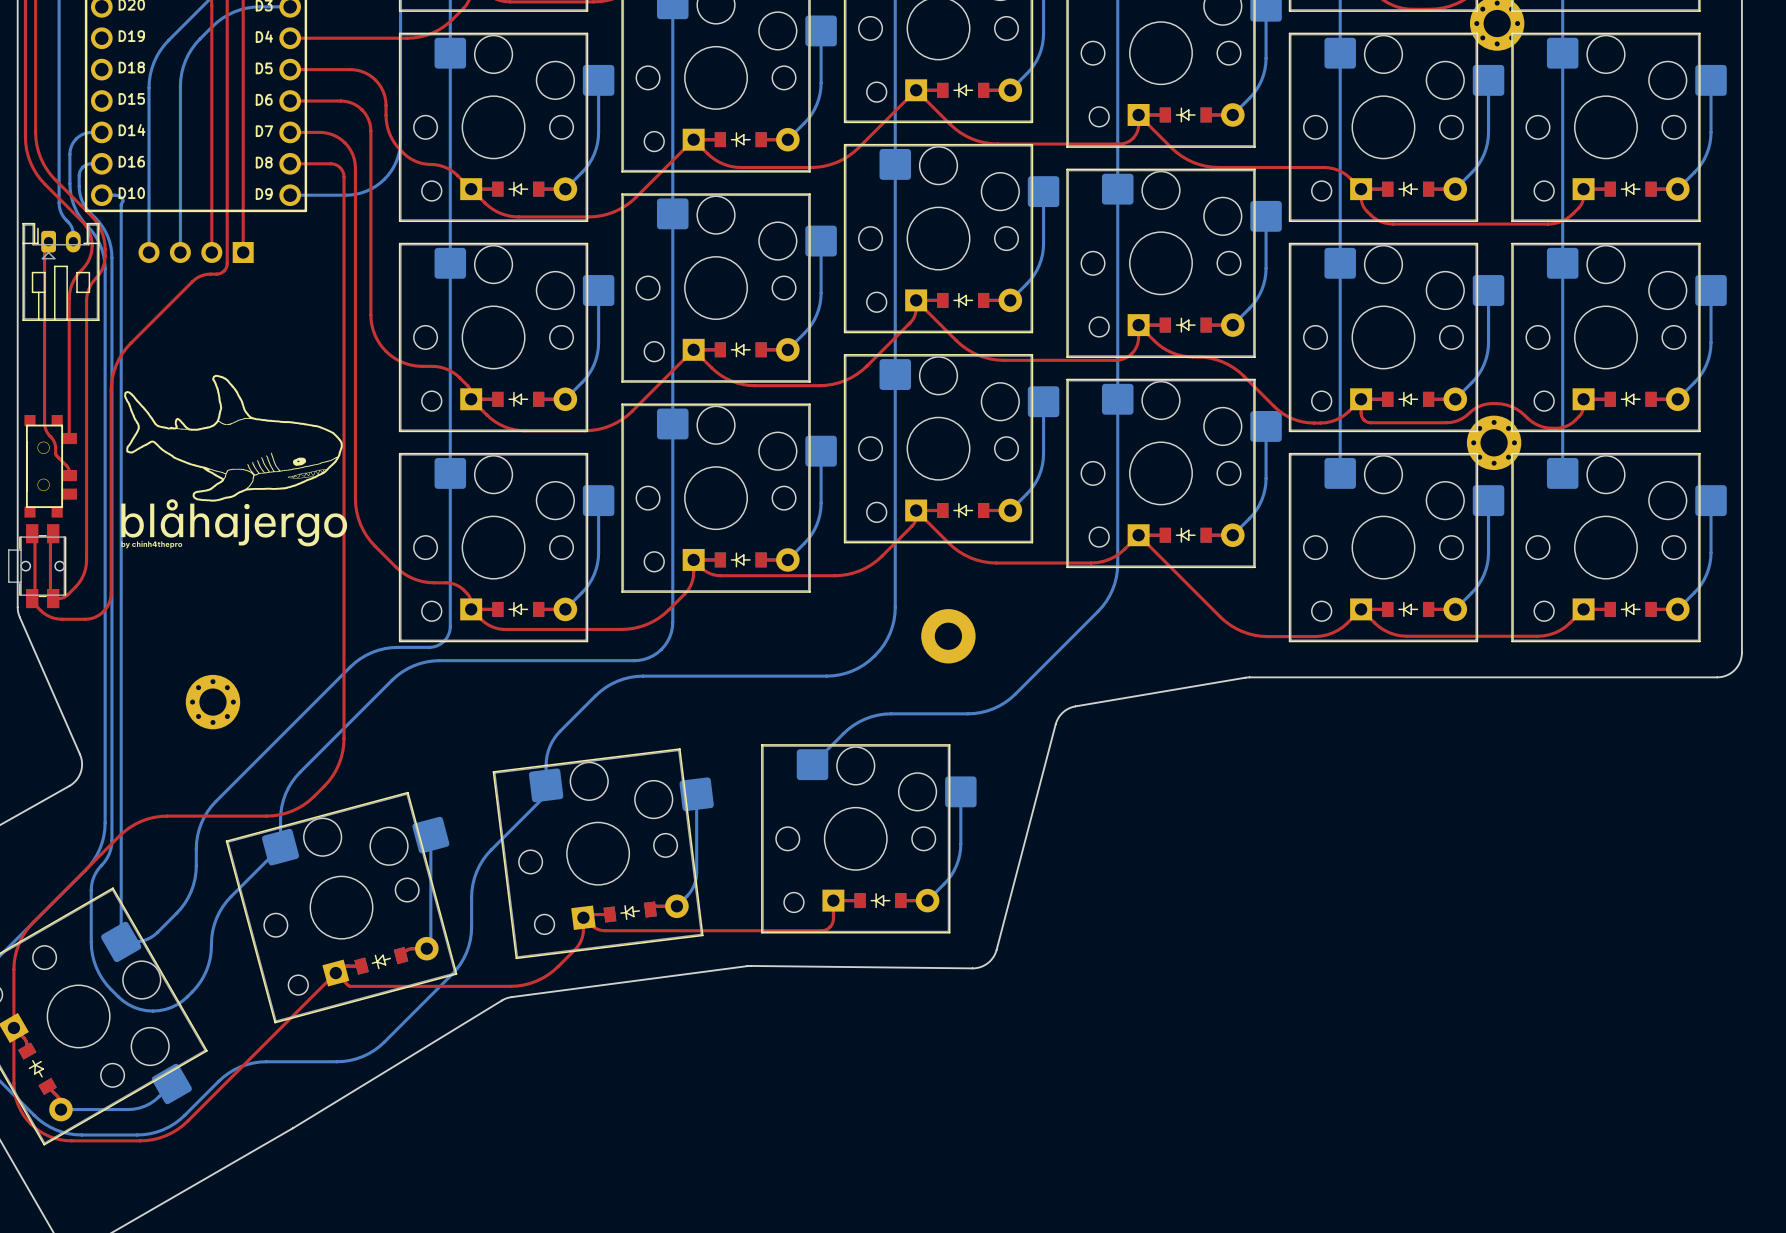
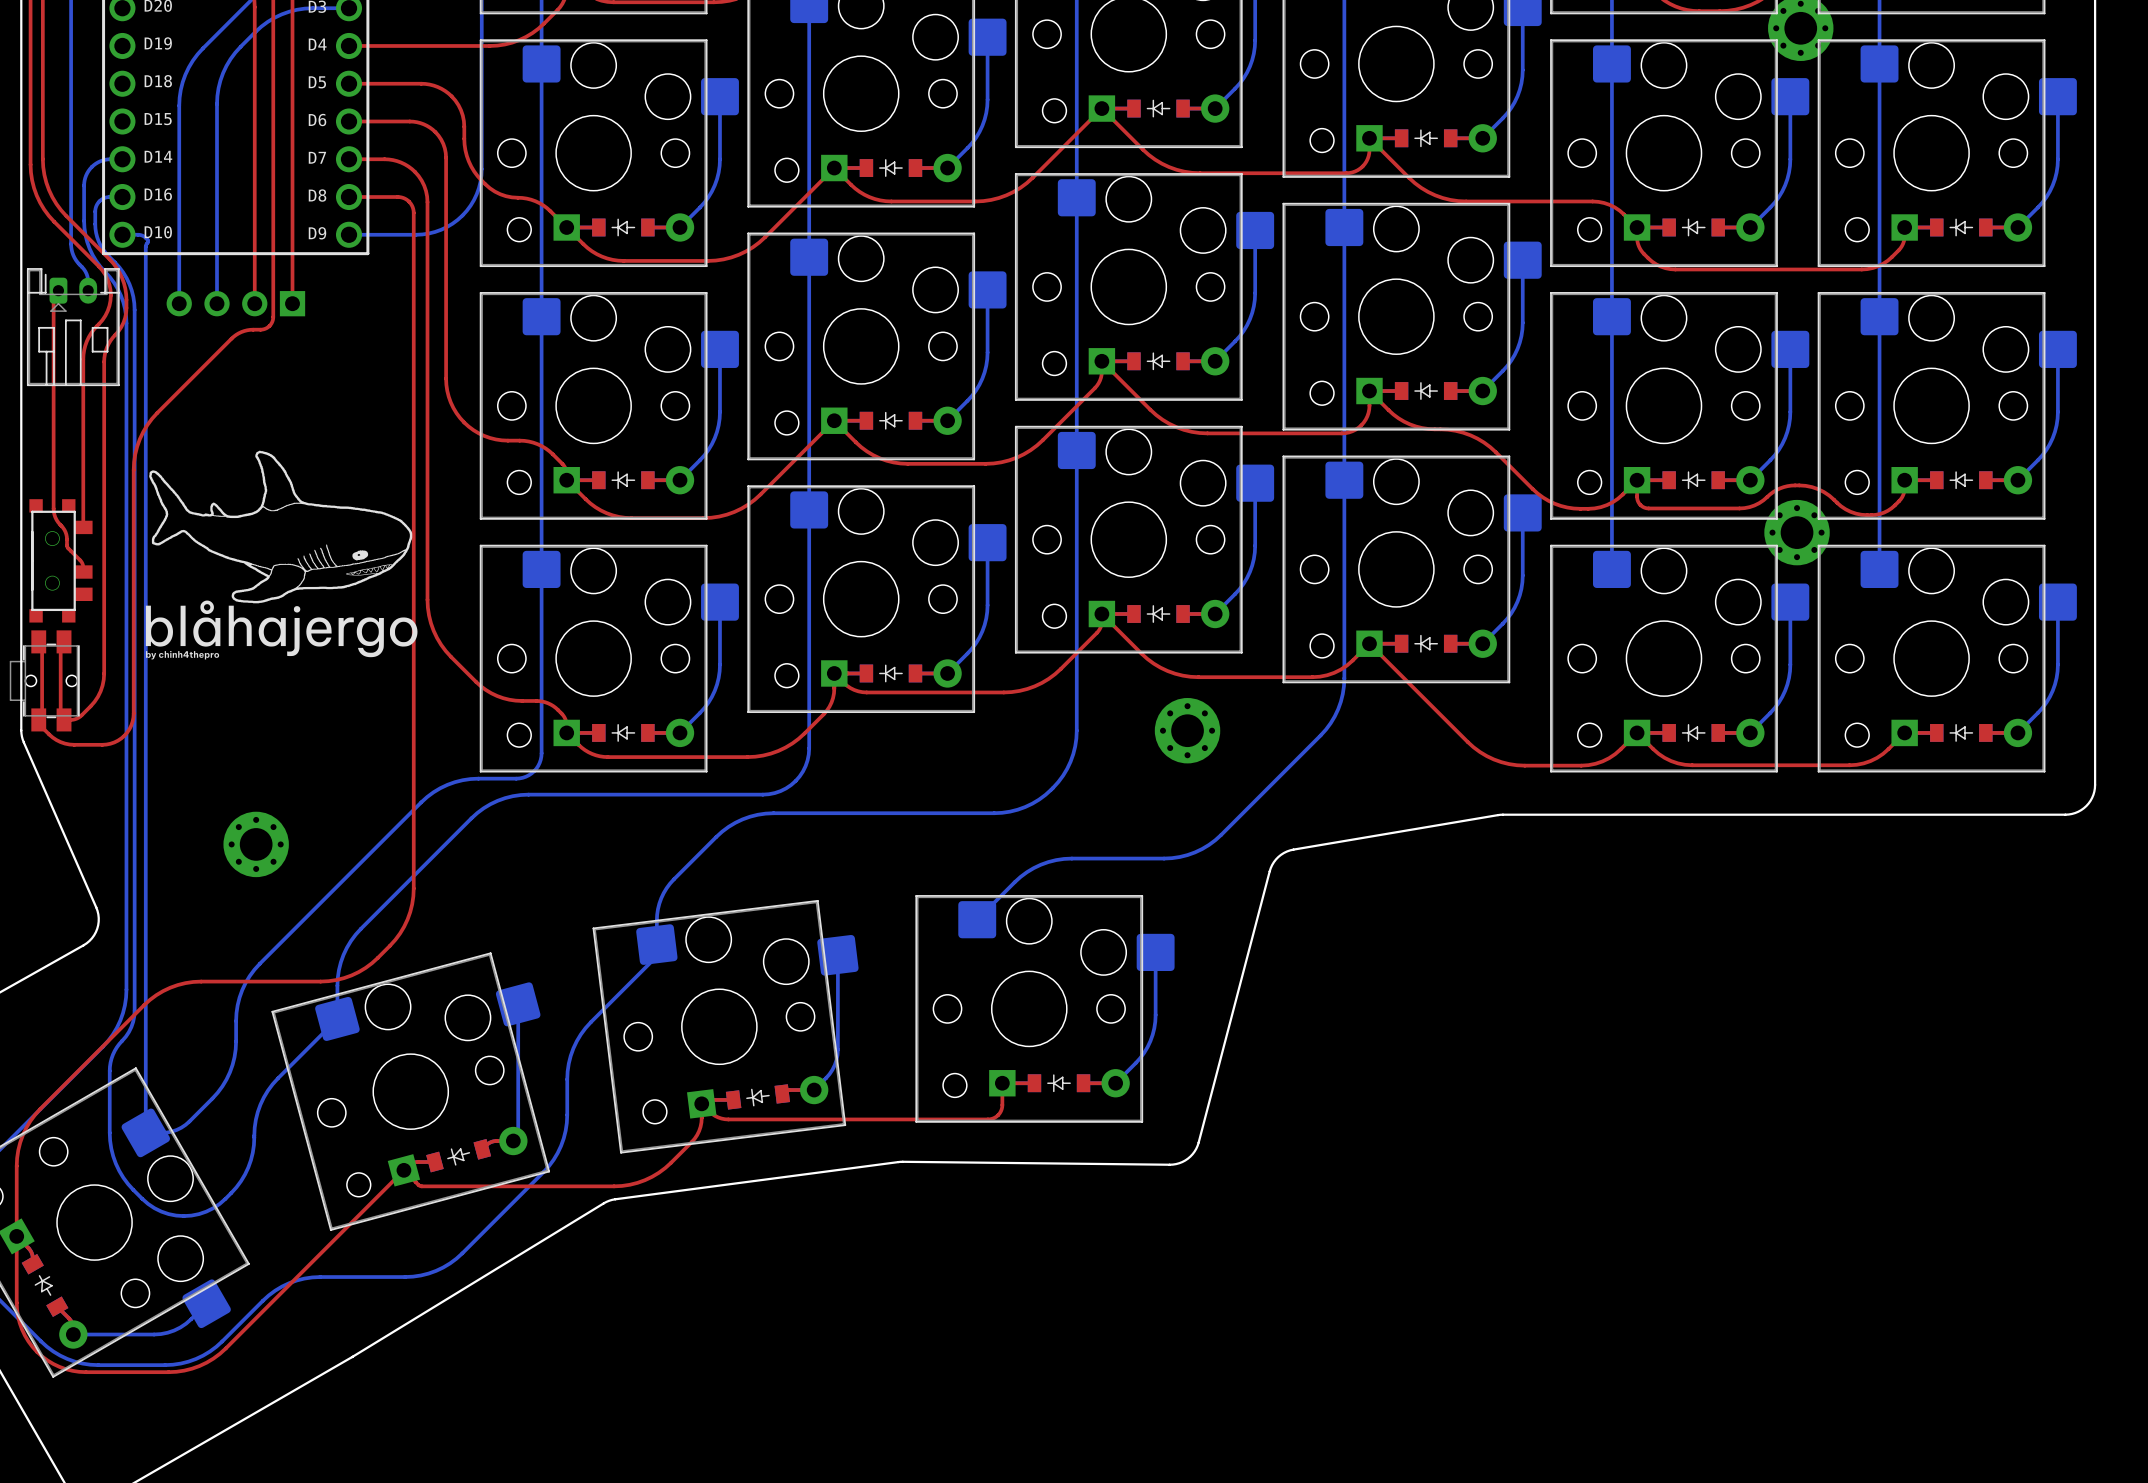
part: none -> (1187, 730)
part: (948, 636) -> none

